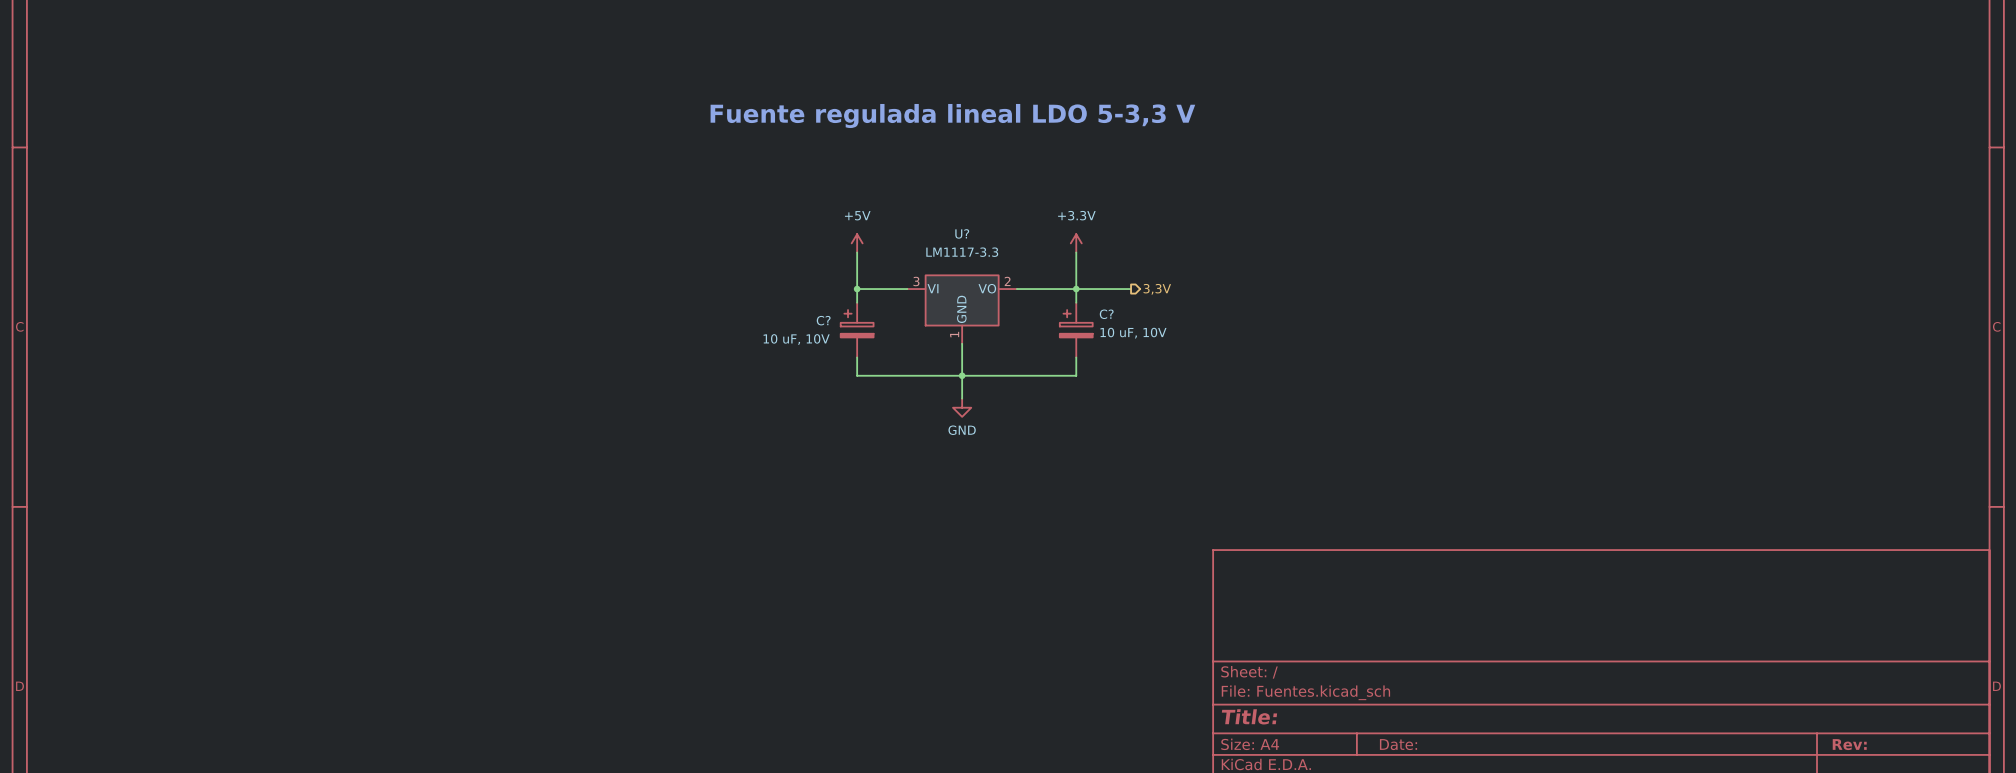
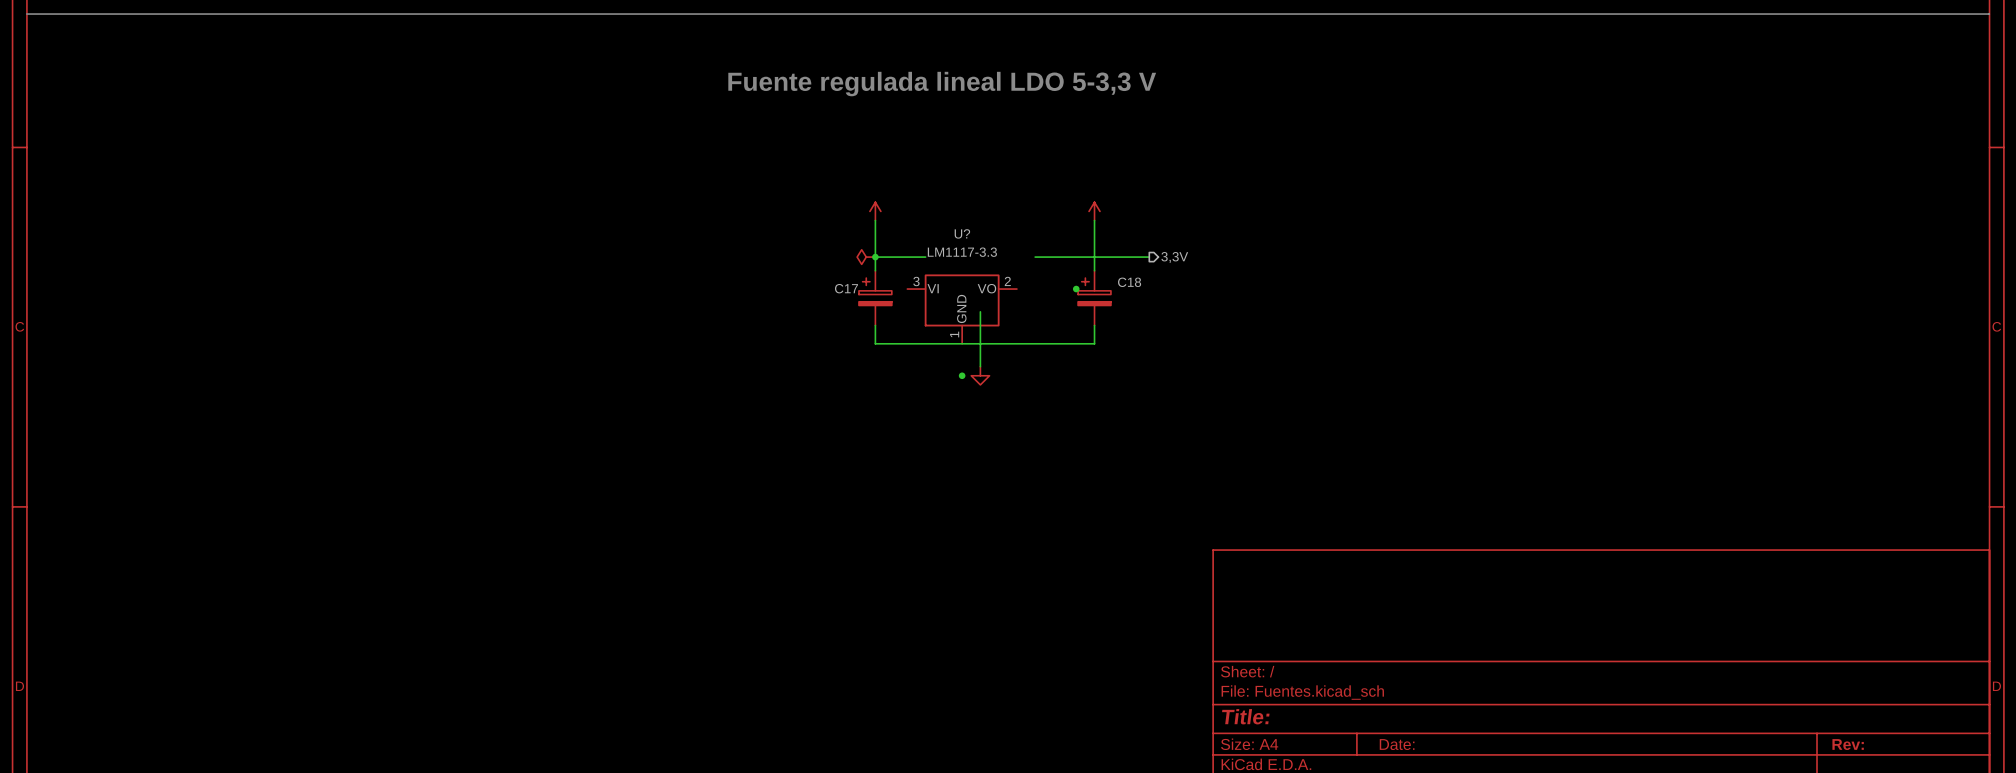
line: none -> (26, 14) (1989, 14)
text position: Fuente regulada lineal LDO 5-3,3 V (952, 115) -> Fuente regulada lineal LDO 5-3,3 V (942, 84)
power symbol: none -> (875, 211)
power symbol: none -> (1094, 211)
power symbol: +5V (857, 243) -> none
power symbol: +3.3V (1076, 243) -> none
wire: (857, 252) (857, 302) -> (875, 220) (875, 270)
wire: (1076, 252) (1076, 302) -> (1094, 220) (1094, 270)
power symbol: none -> (866, 257)
wire: (857, 289) (907, 289) -> (875, 257) (925, 257)
junction position: (857, 289) -> (875, 257)
wire: (1016, 289) (1131, 289) -> (1035, 257) (1149, 257)
hierarchical label position: 3,3V (1157, 289) -> 3,3V (1174, 257)
C17: none -> (875, 298)
C18: none -> (1094, 298)
C?: 10 uF, 10V (857, 330) -> none
C?: 10 uF, 10V (1076, 330) -> none
wire: (962, 343) (962, 398) -> (980, 311) (980, 366)
wire: (857, 357) (857, 375) (1076, 375) (1076, 357) -> (875, 325) (875, 343) (1094, 343) (1094, 325)
power symbol: none -> (980, 375)
power symbol: GND (962, 407) -> none

